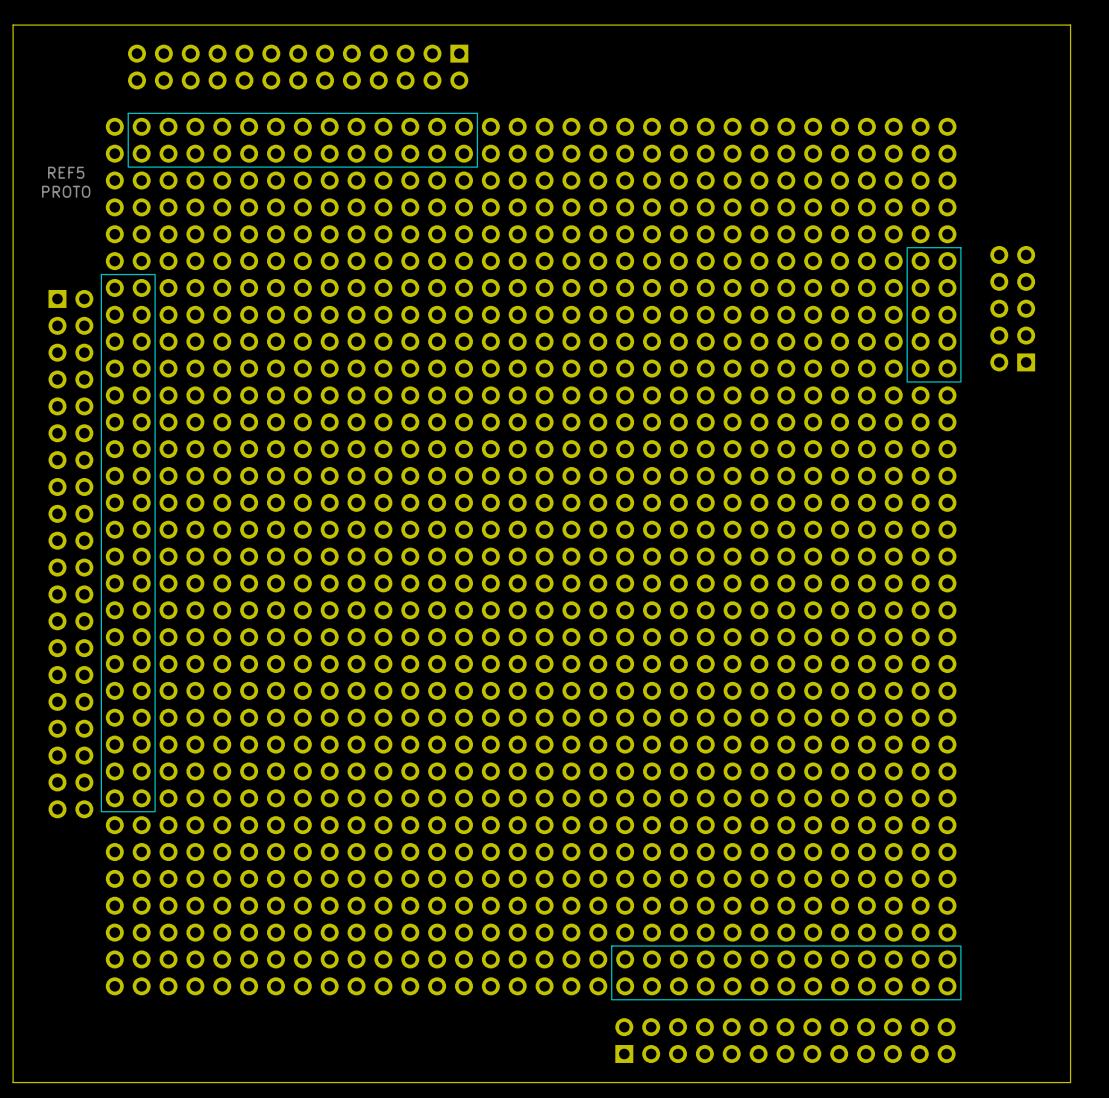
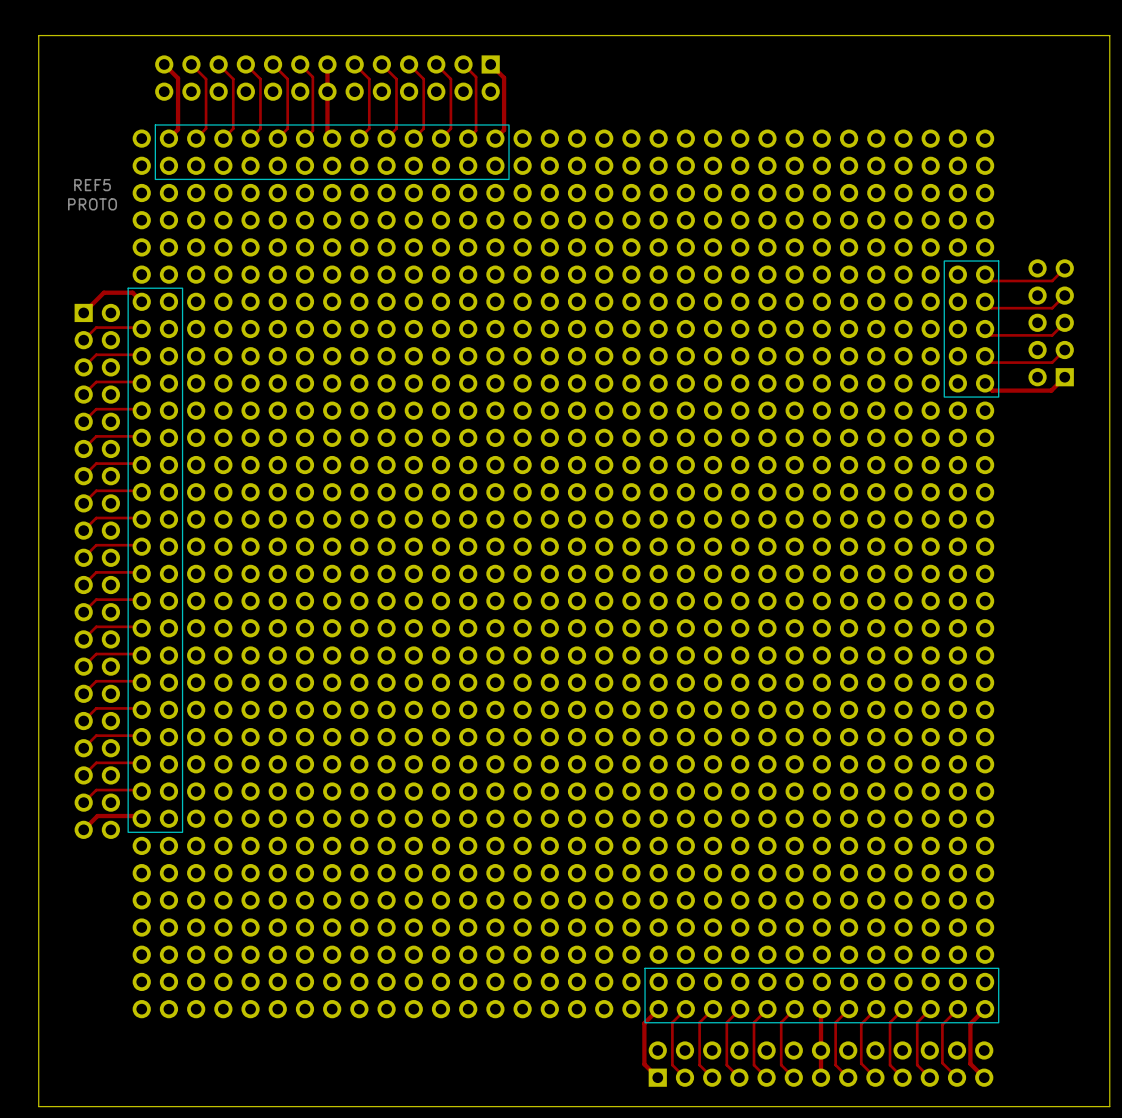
track: none -> (164, 64) (178, 78) (178, 129) (168, 138)
track: none -> (191, 64) (206, 79) (206, 128) (196, 138)
track: none -> (218, 64) (233, 79) (233, 128) (223, 138)
track: none -> (245, 64) (260, 79) (260, 128) (250, 138)
track: none -> (273, 64) (287, 79) (287, 128) (277, 138)
track: none -> (300, 64) (312, 77) (312, 130) (304, 138)
track: none -> (327, 64) (327, 133) (332, 138)
track: none -> (354, 64) (369, 79) (369, 128) (359, 138)
track: none -> (381, 64) (396, 79) (396, 128) (386, 138)
track: none -> (409, 64) (423, 79) (423, 128) (413, 138)
track: none -> (436, 64) (450, 79) (450, 128) (441, 138)
track: none -> (463, 64) (476, 77) (476, 130) (468, 138)
track: none -> (490, 64) (504, 77) (504, 129) (495, 138)
track: none -> (1064, 268) (1052, 280) (991, 280) (985, 274)
track: none -> (1064, 295) (1052, 308) (991, 308) (985, 301)
track: none -> (141, 301) (132, 292) (103, 292) (83, 312)
track: none -> (1064, 322) (1052, 335) (991, 335) (985, 329)
track: none -> (141, 329) (96, 327) (83, 340)
track: none -> (1064, 350) (1052, 362) (991, 362) (985, 356)
track: none -> (141, 356) (96, 354) (83, 367)
track: none -> (1064, 377) (1051, 390) (992, 390) (985, 383)
track: none -> (141, 383) (96, 381) (83, 394)
track: none -> (141, 410) (96, 409) (83, 421)
track: none -> (141, 437) (96, 436) (83, 448)
track: none -> (141, 465) (96, 463) (83, 476)
track: none -> (141, 492) (96, 490) (83, 503)
track: none -> (141, 519) (96, 518) (83, 530)
track: none -> (141, 546) (96, 545) (83, 557)
track: none -> (141, 573) (96, 572) (83, 585)
track: none -> (141, 601) (96, 599) (83, 612)
track: none -> (141, 628) (96, 626) (83, 639)
track: none -> (141, 655) (96, 654) (83, 666)
track: none -> (141, 682) (96, 681) (83, 693)
track: none -> (141, 709) (96, 708) (83, 721)
track: none -> (141, 737) (96, 735) (83, 748)
track: none -> (141, 764) (96, 762) (83, 775)
track: none -> (141, 791) (96, 790) (83, 802)
track: none -> (141, 818) (139, 816) (97, 816) (83, 829)
track: none -> (658, 1009) (644, 1023) (644, 1064) (657, 1077)
track: none -> (685, 1009) (672, 1022) (672, 1065) (684, 1077)
track: none -> (713, 1009) (699, 1022) (699, 1065) (712, 1077)
track: none -> (740, 1009) (726, 1022) (726, 1065) (739, 1077)
track: none -> (767, 1009) (754, 1022) (754, 1065) (766, 1077)
track: none -> (794, 1009) (781, 1022) (781, 1065) (793, 1077)
track: none -> (821, 1009) (821, 1077)
track: none -> (849, 1009) (835, 1022) (835, 1065) (848, 1077)
track: none -> (876, 1009) (861, 1024) (861, 1063) (875, 1077)
track: none -> (903, 1009) (890, 1022) (890, 1065) (902, 1077)
track: none -> (930, 1009) (917, 1022) (917, 1065) (929, 1077)
track: none -> (957, 1009) (942, 1024) (942, 1063) (957, 1077)
track: none -> (985, 1009) (970, 1023) (970, 1063) (984, 1077)

